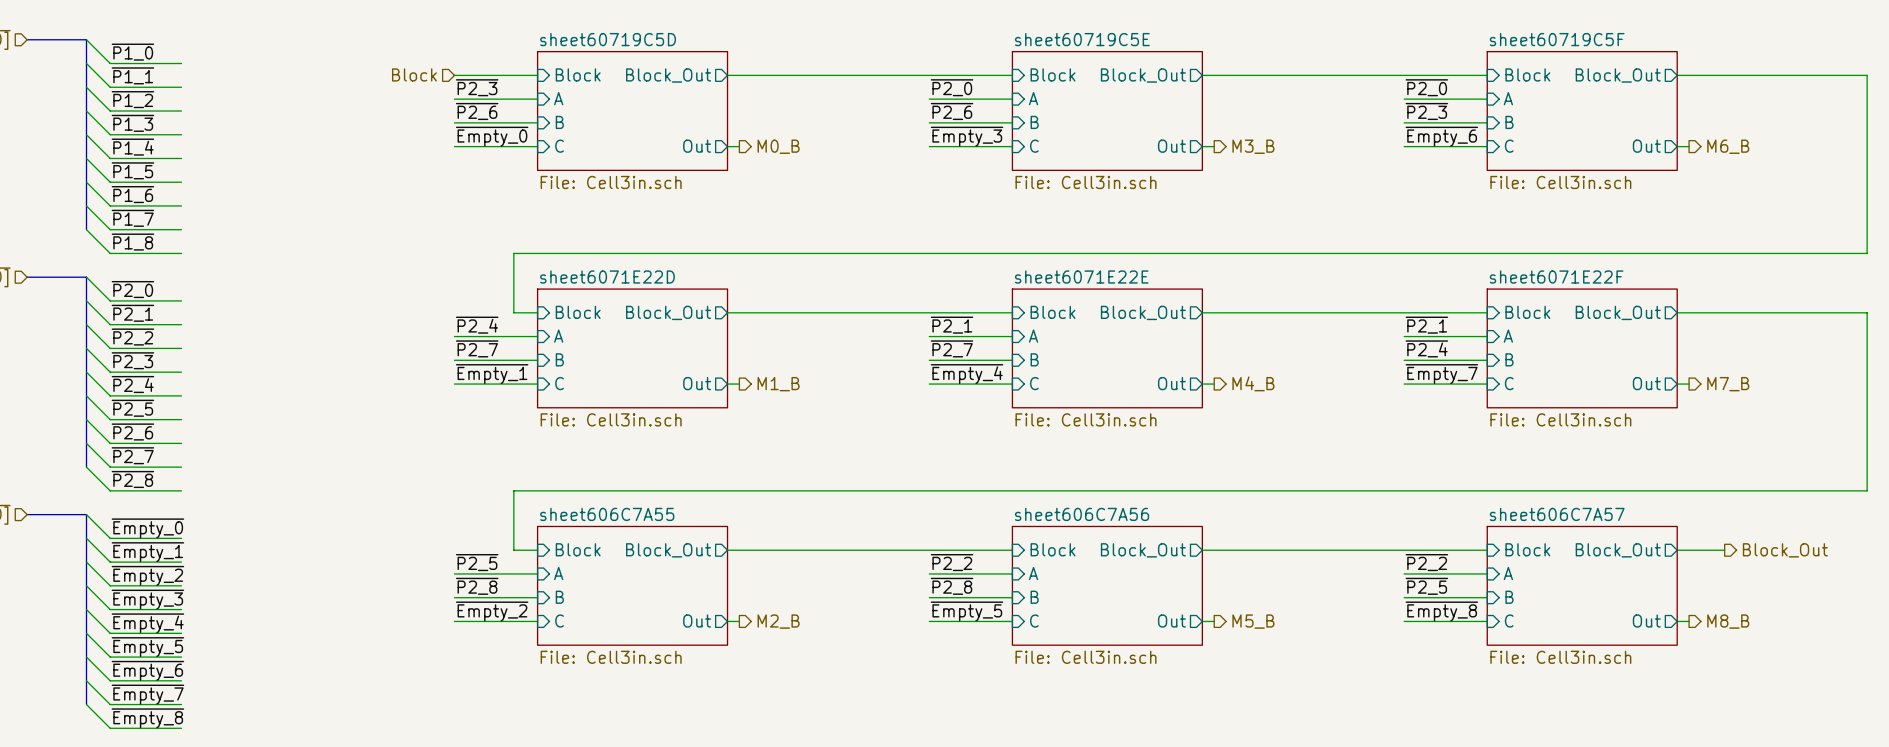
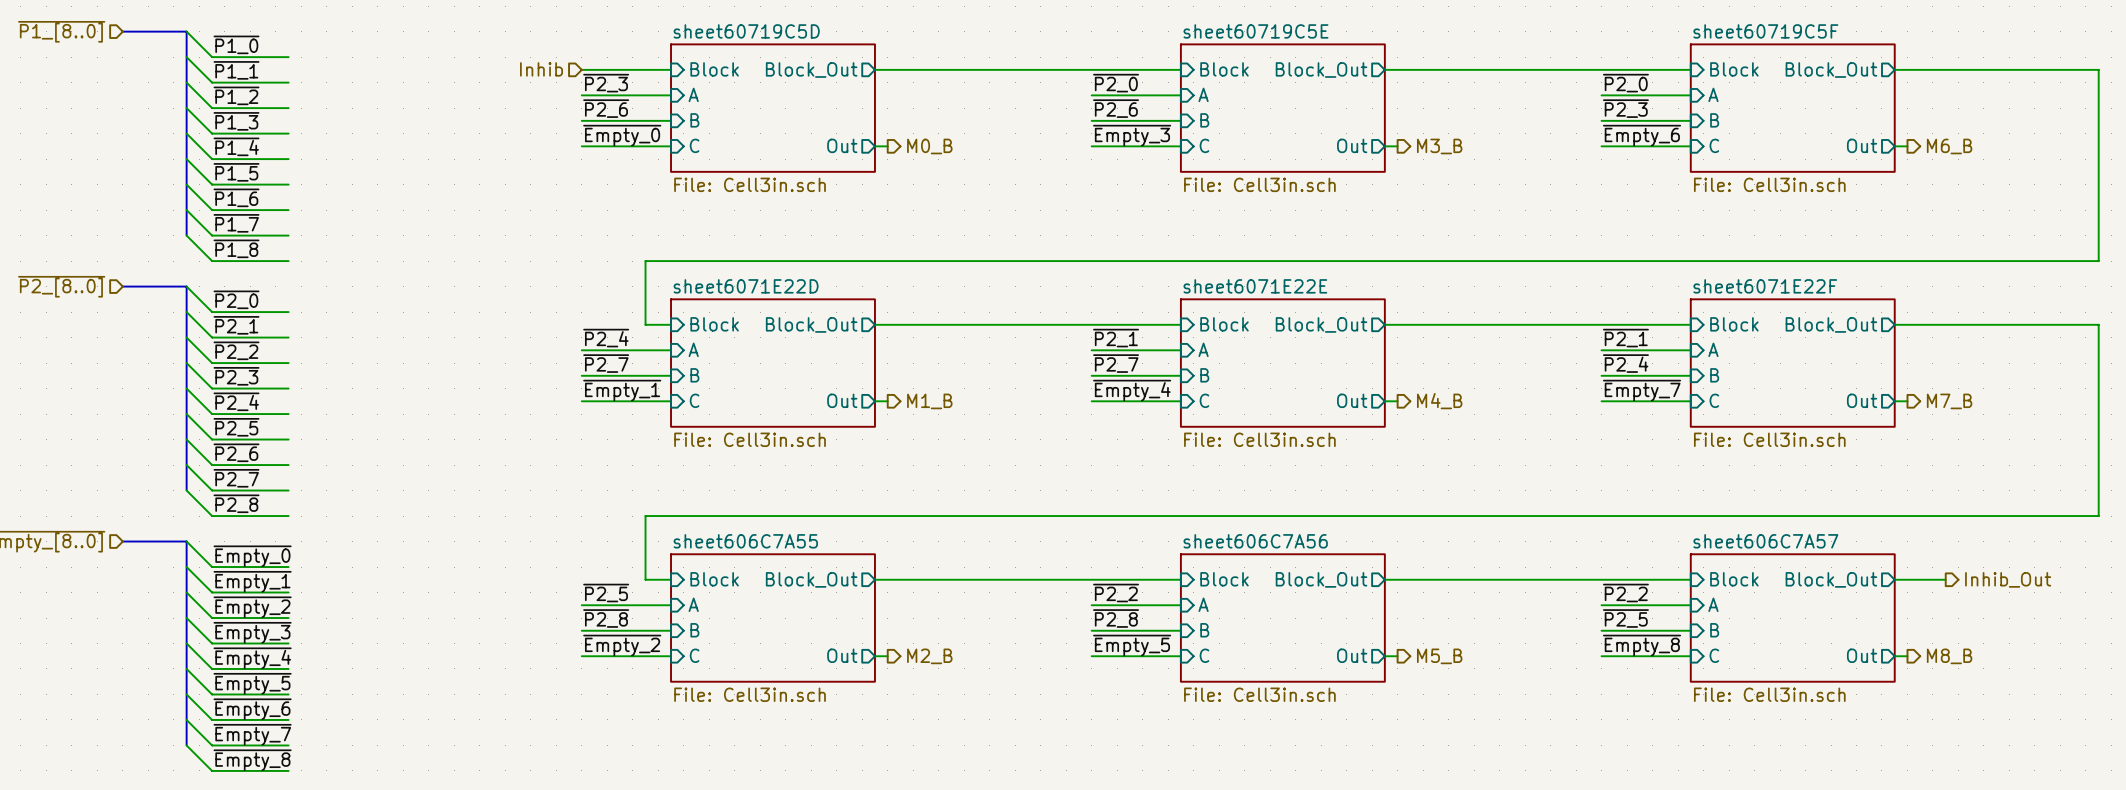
hierarchical label: Block (414, 74) -> Inhib (541, 69)
hierarchical label: Block_Out (1785, 550) -> Inhib_Out (2008, 579)

